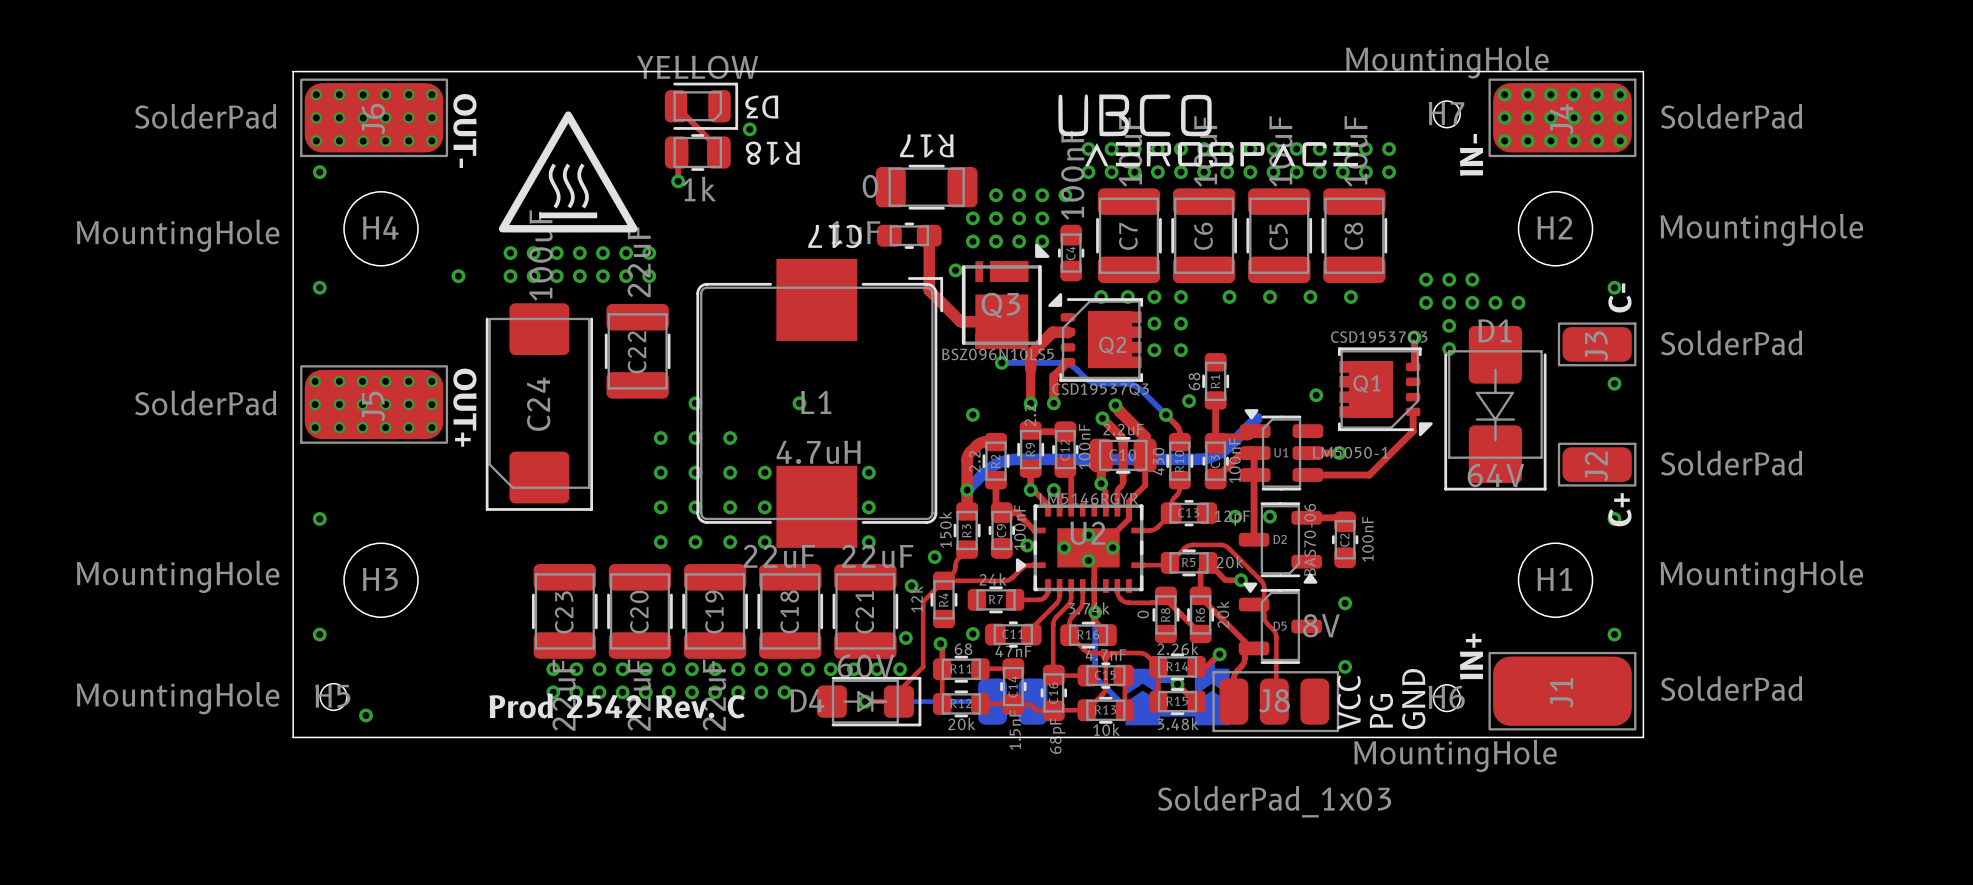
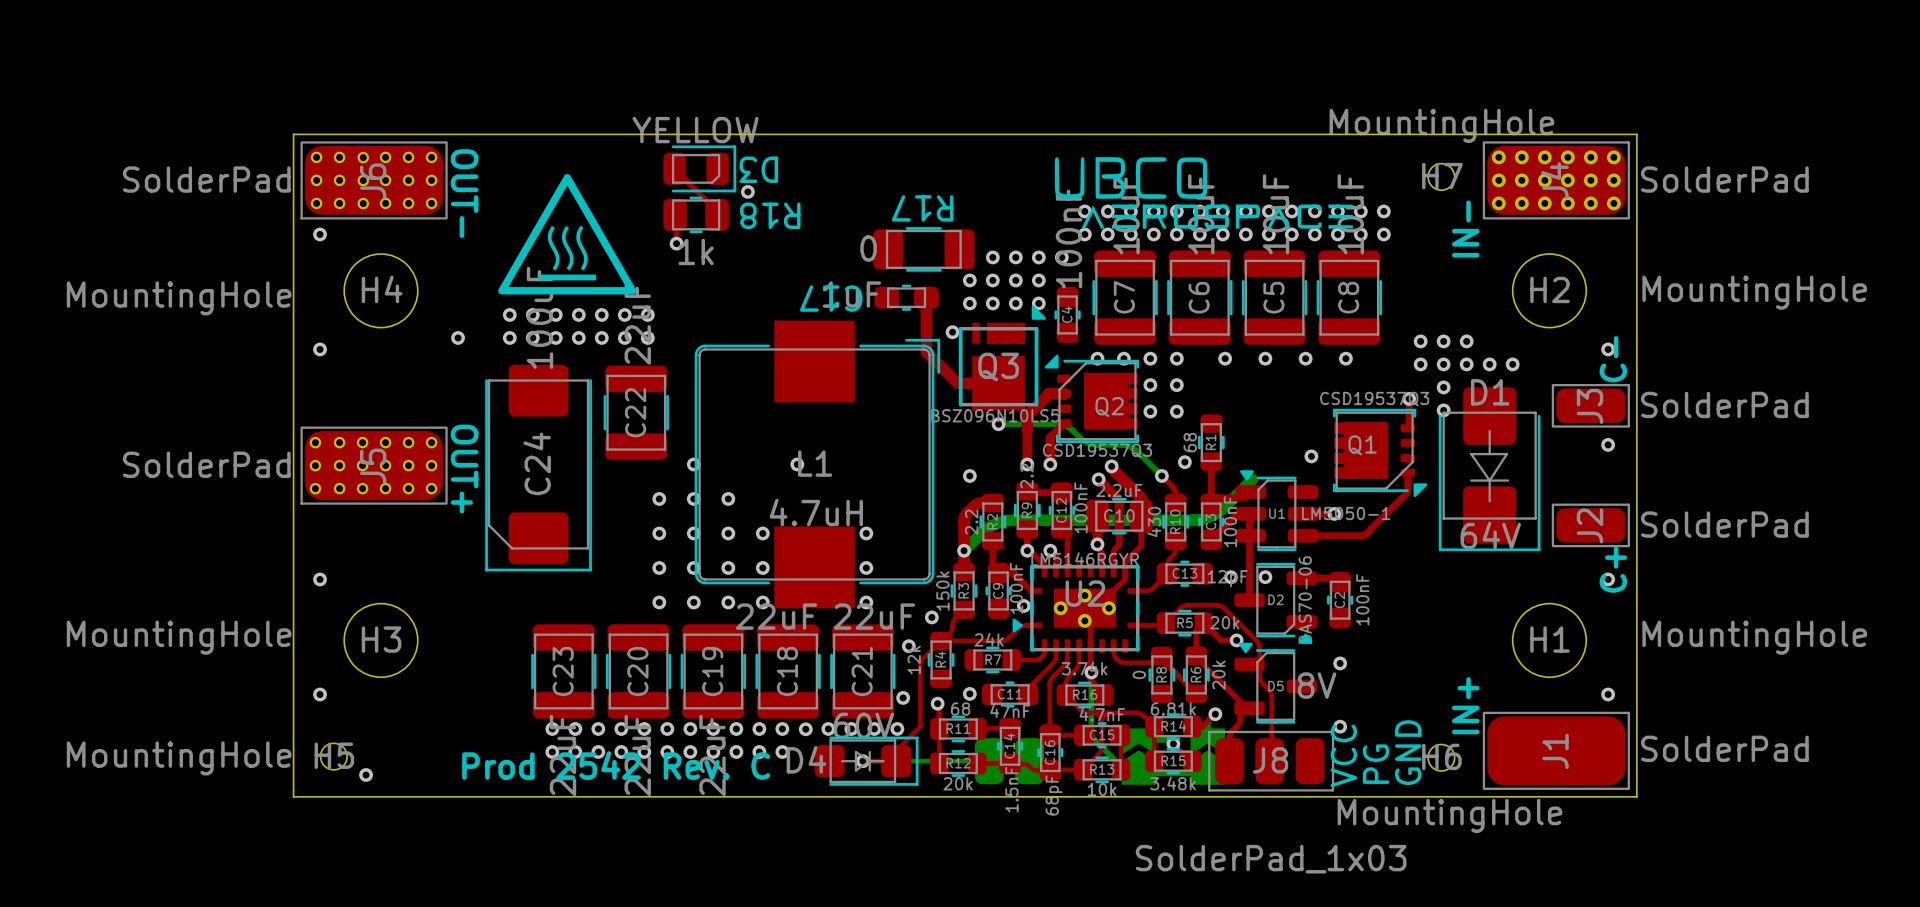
R14 value: 2.26k (1178, 648) -> 6.81k (1173, 709)

